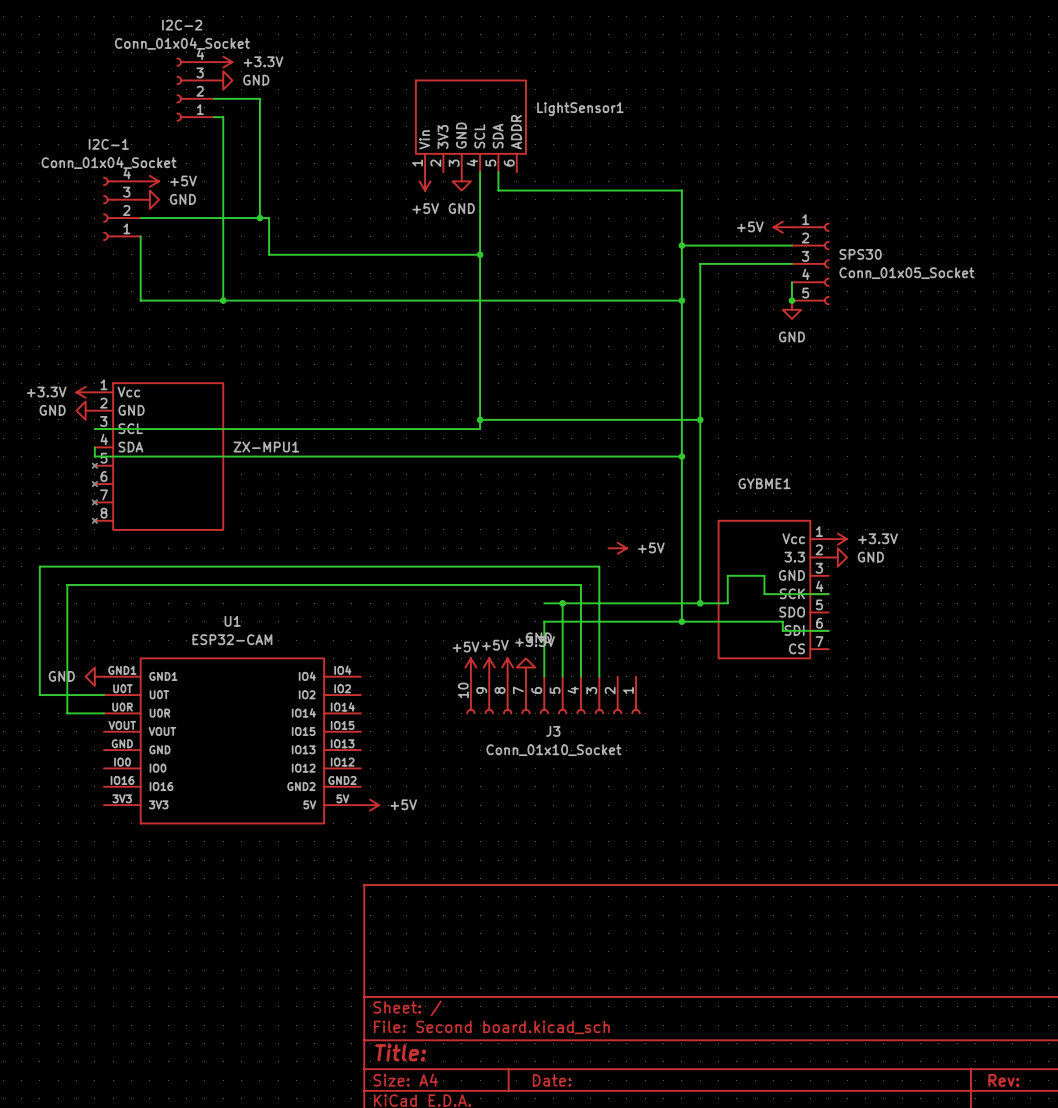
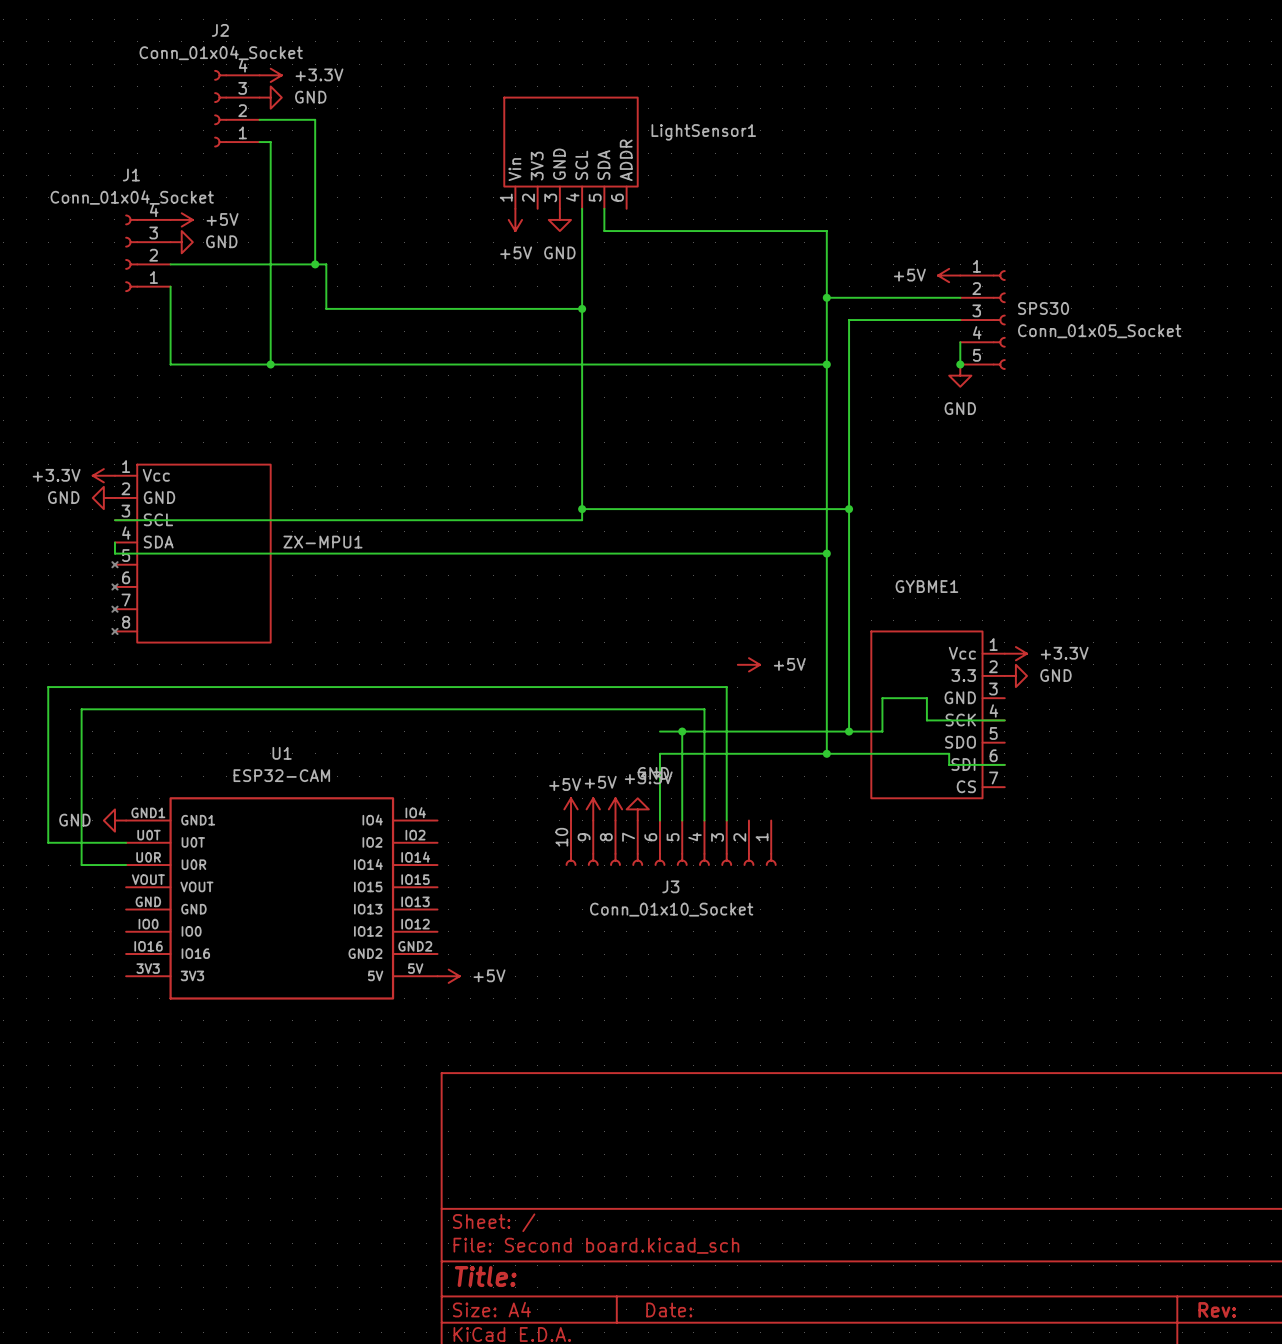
I2C-2 name: I2C-2 (182, 25) -> J2 (220, 30)
I2C-1 name: I2C-1 (108, 144) -> J1 (131, 175)

